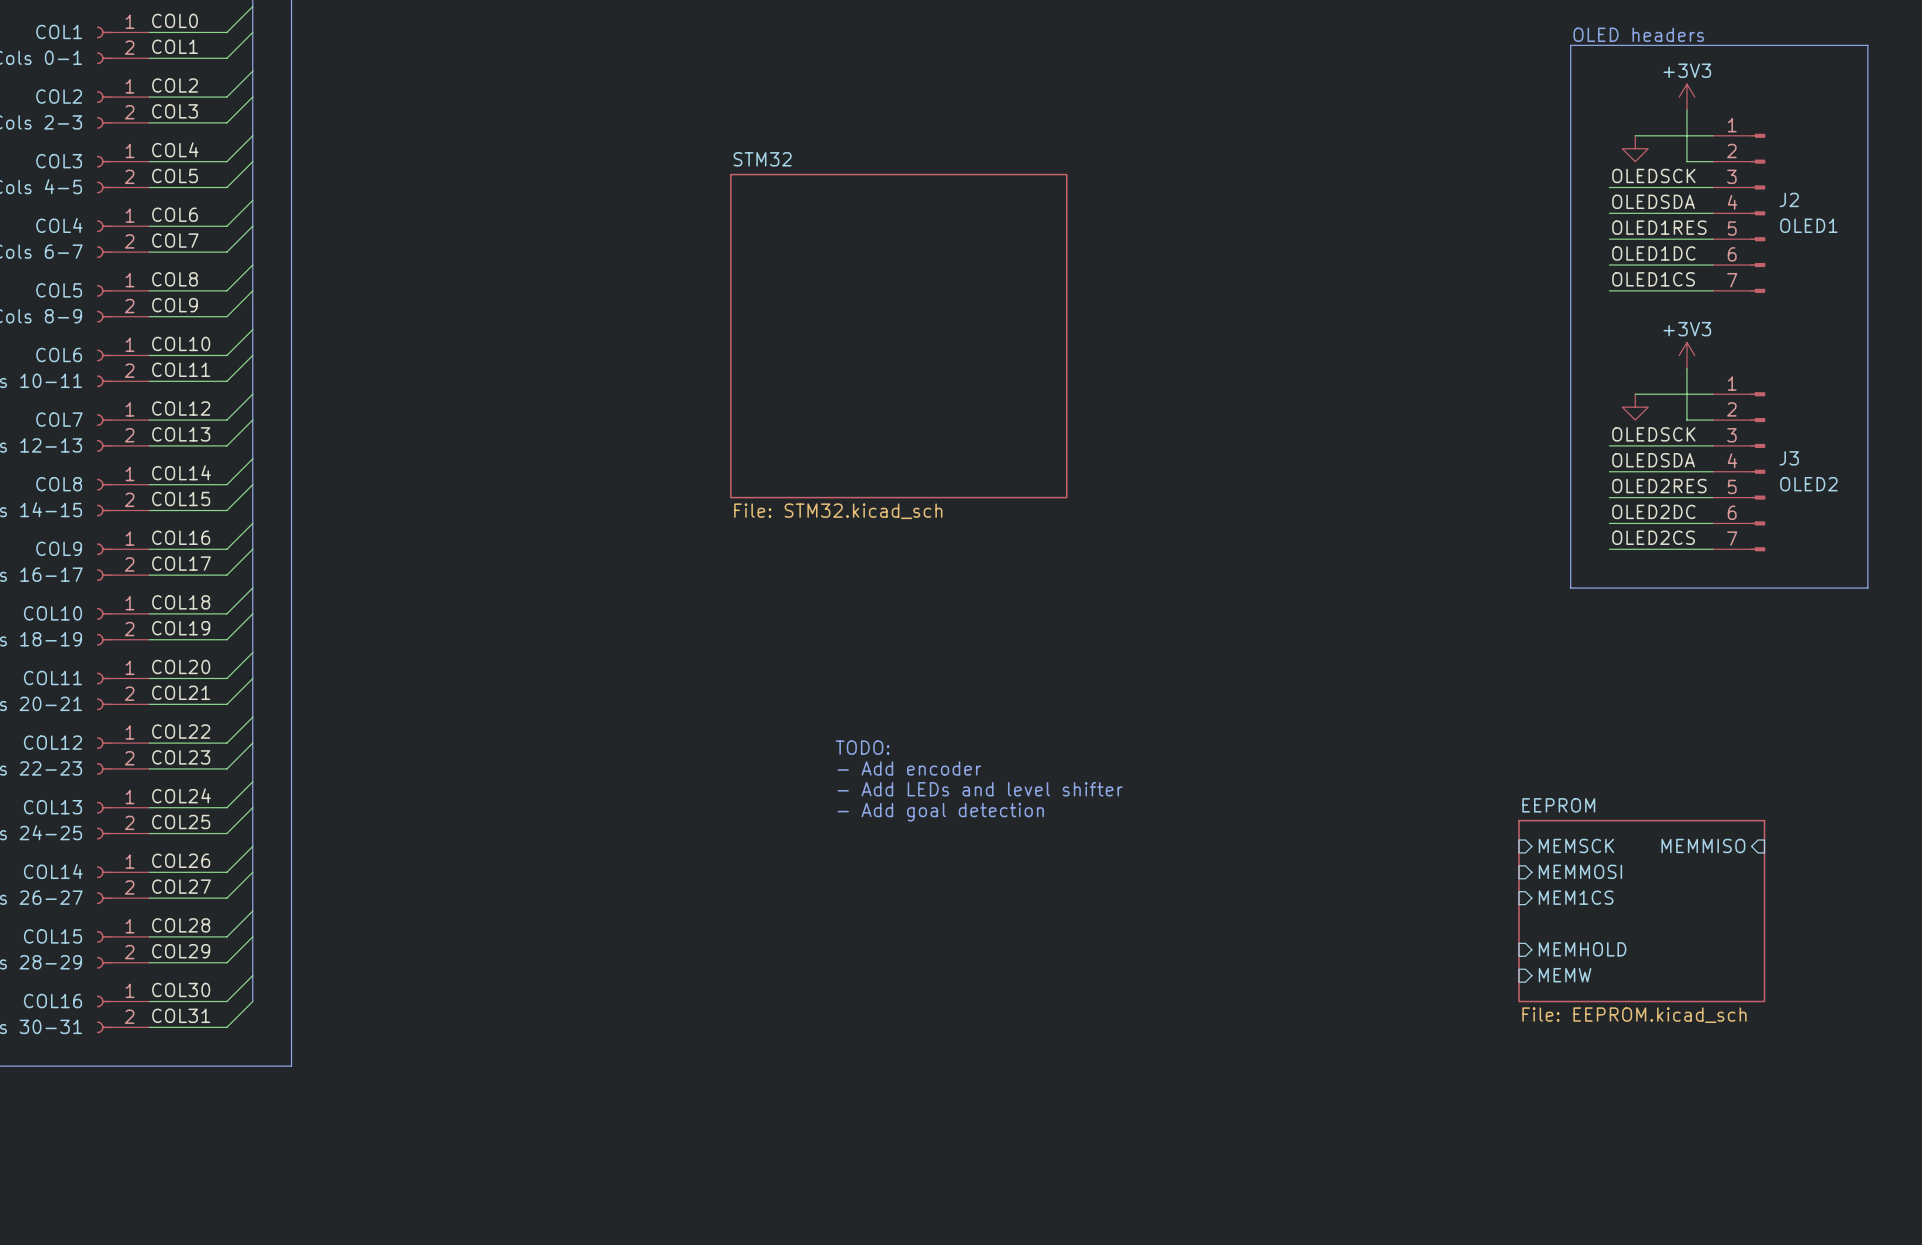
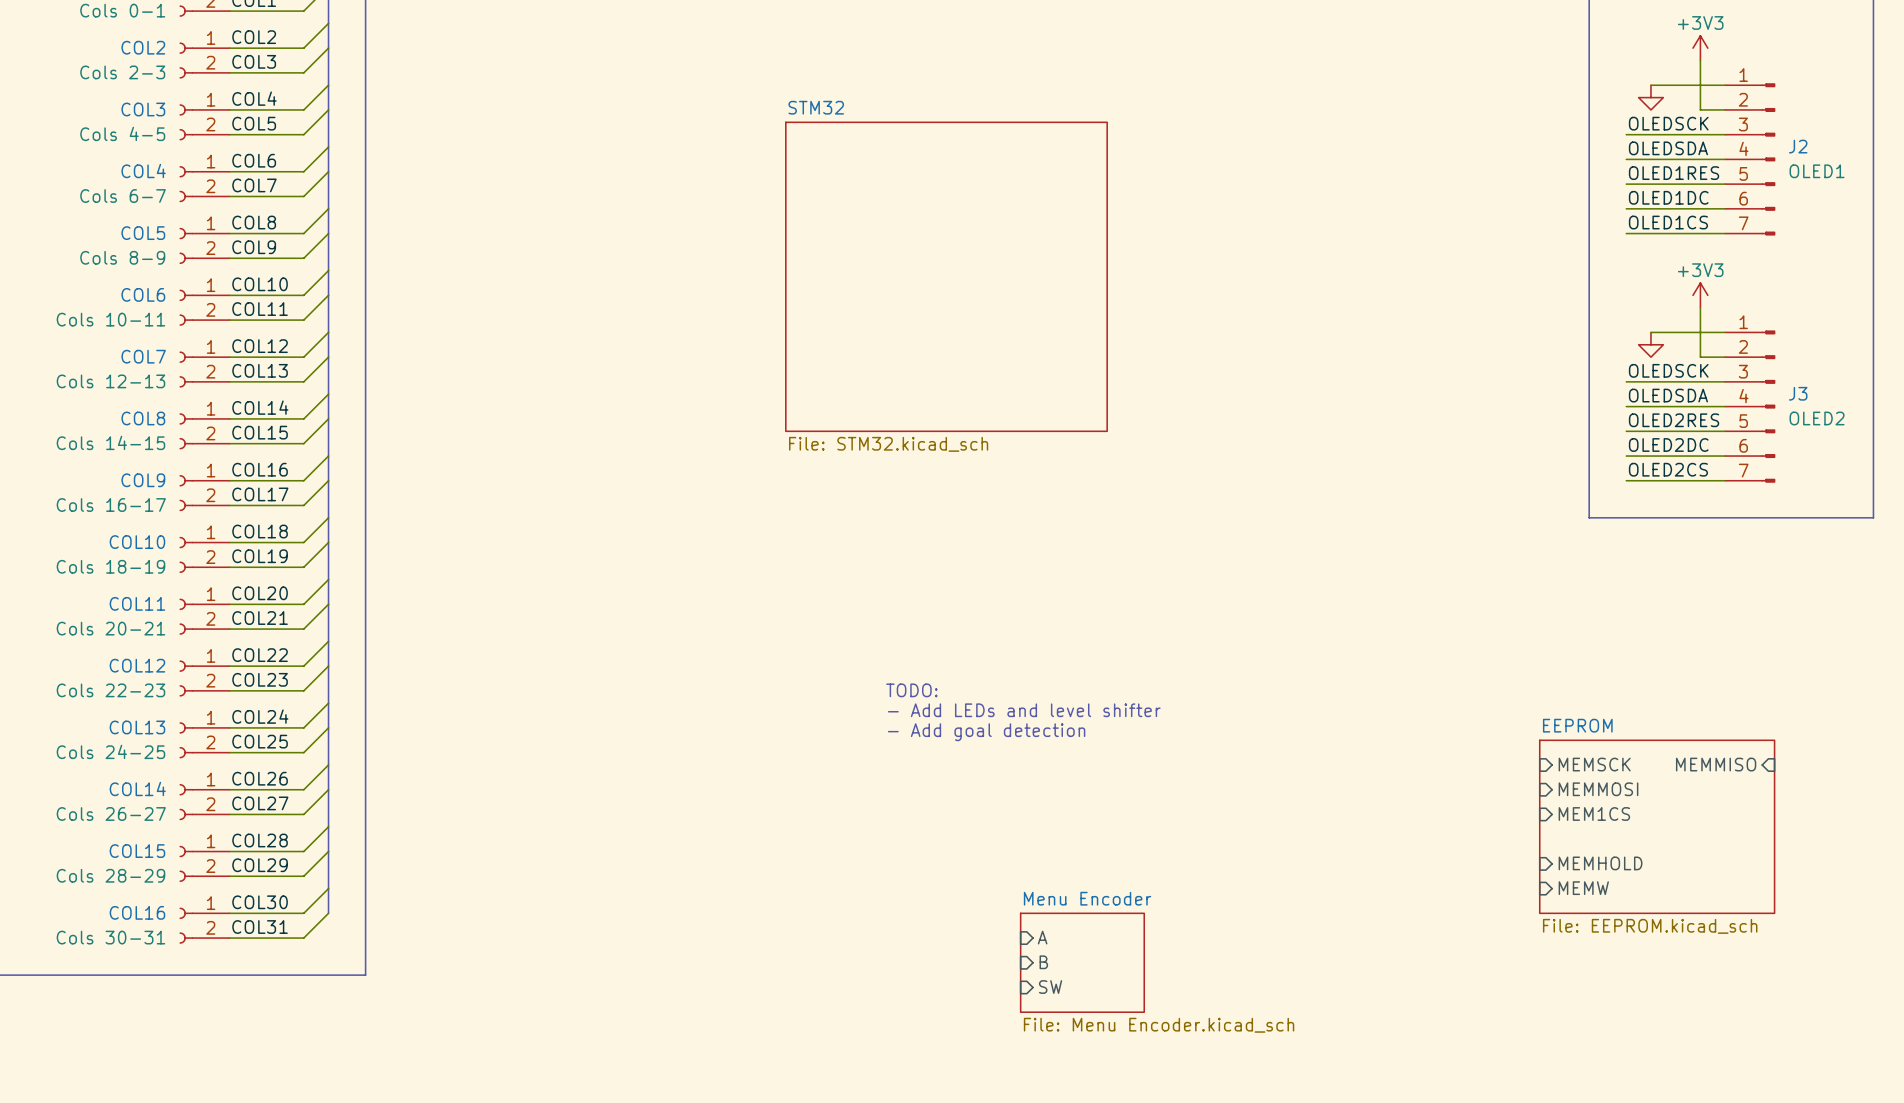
text: TODO: (862, 747) -> none
text: - Add encoder (909, 768) -> TODO: (911, 690)
sheet pin: none -> A (1042, 937)
sheet pin: none -> B (1043, 962)
sheet Menu Encoder: none -> File: Menu Encoder.kicad_sch (1082, 962)
sheet pin: none -> SW (1050, 987)

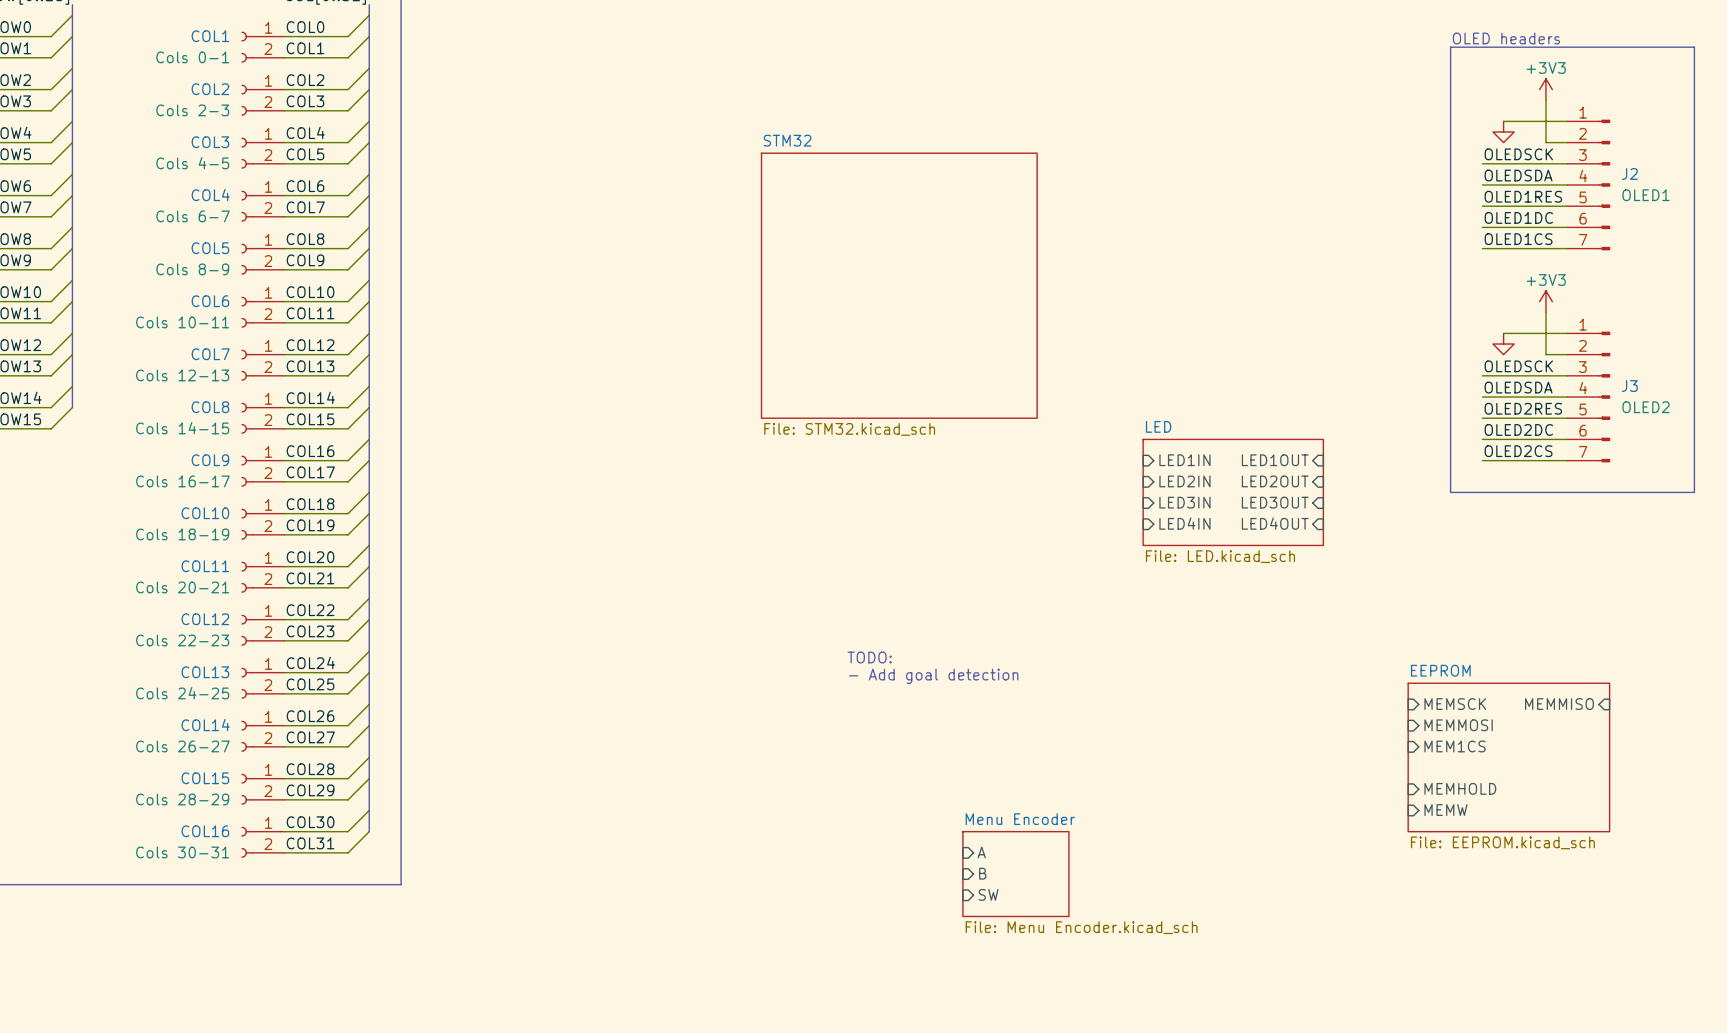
sheet pin: none -> LED1IN (1184, 460)
sheet pin: none -> LED1OUT (1275, 460)
sheet pin: none -> LED2IN (1184, 481)
sheet pin: none -> LED2OUT (1275, 481)
sheet LED: none -> File: LED.kicad_sch (1233, 492)
sheet pin: none -> LED3IN (1184, 502)
sheet pin: none -> LED3OUT (1275, 502)
sheet pin: none -> LED4IN (1184, 523)
sheet pin: none -> LED4OUT (1275, 523)
text: TODO: (911, 690) -> none
text: - Add LEDs and level shifter (1024, 710) -> TODO: (869, 657)

